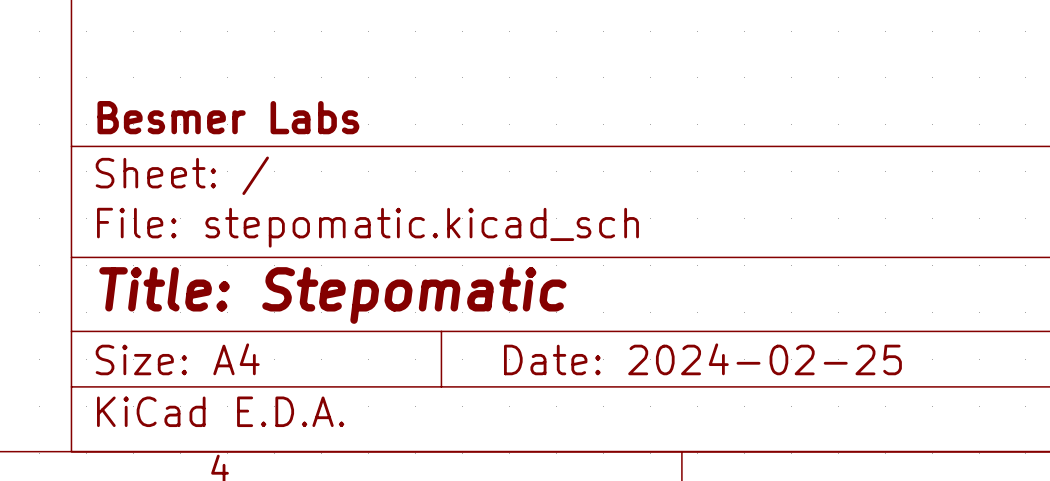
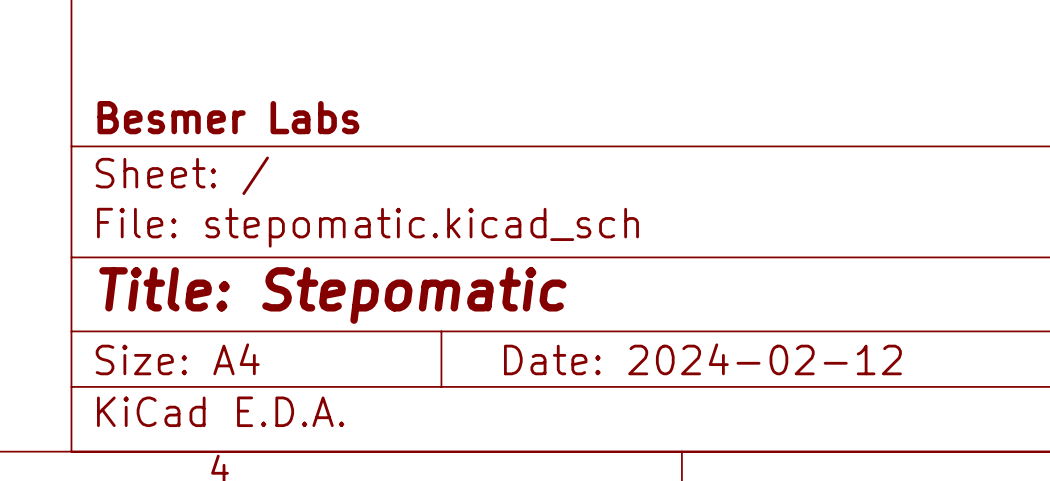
title block: Date: 2024-02-25 (702, 359) -> Date: 2024-02-12 (702, 359)

